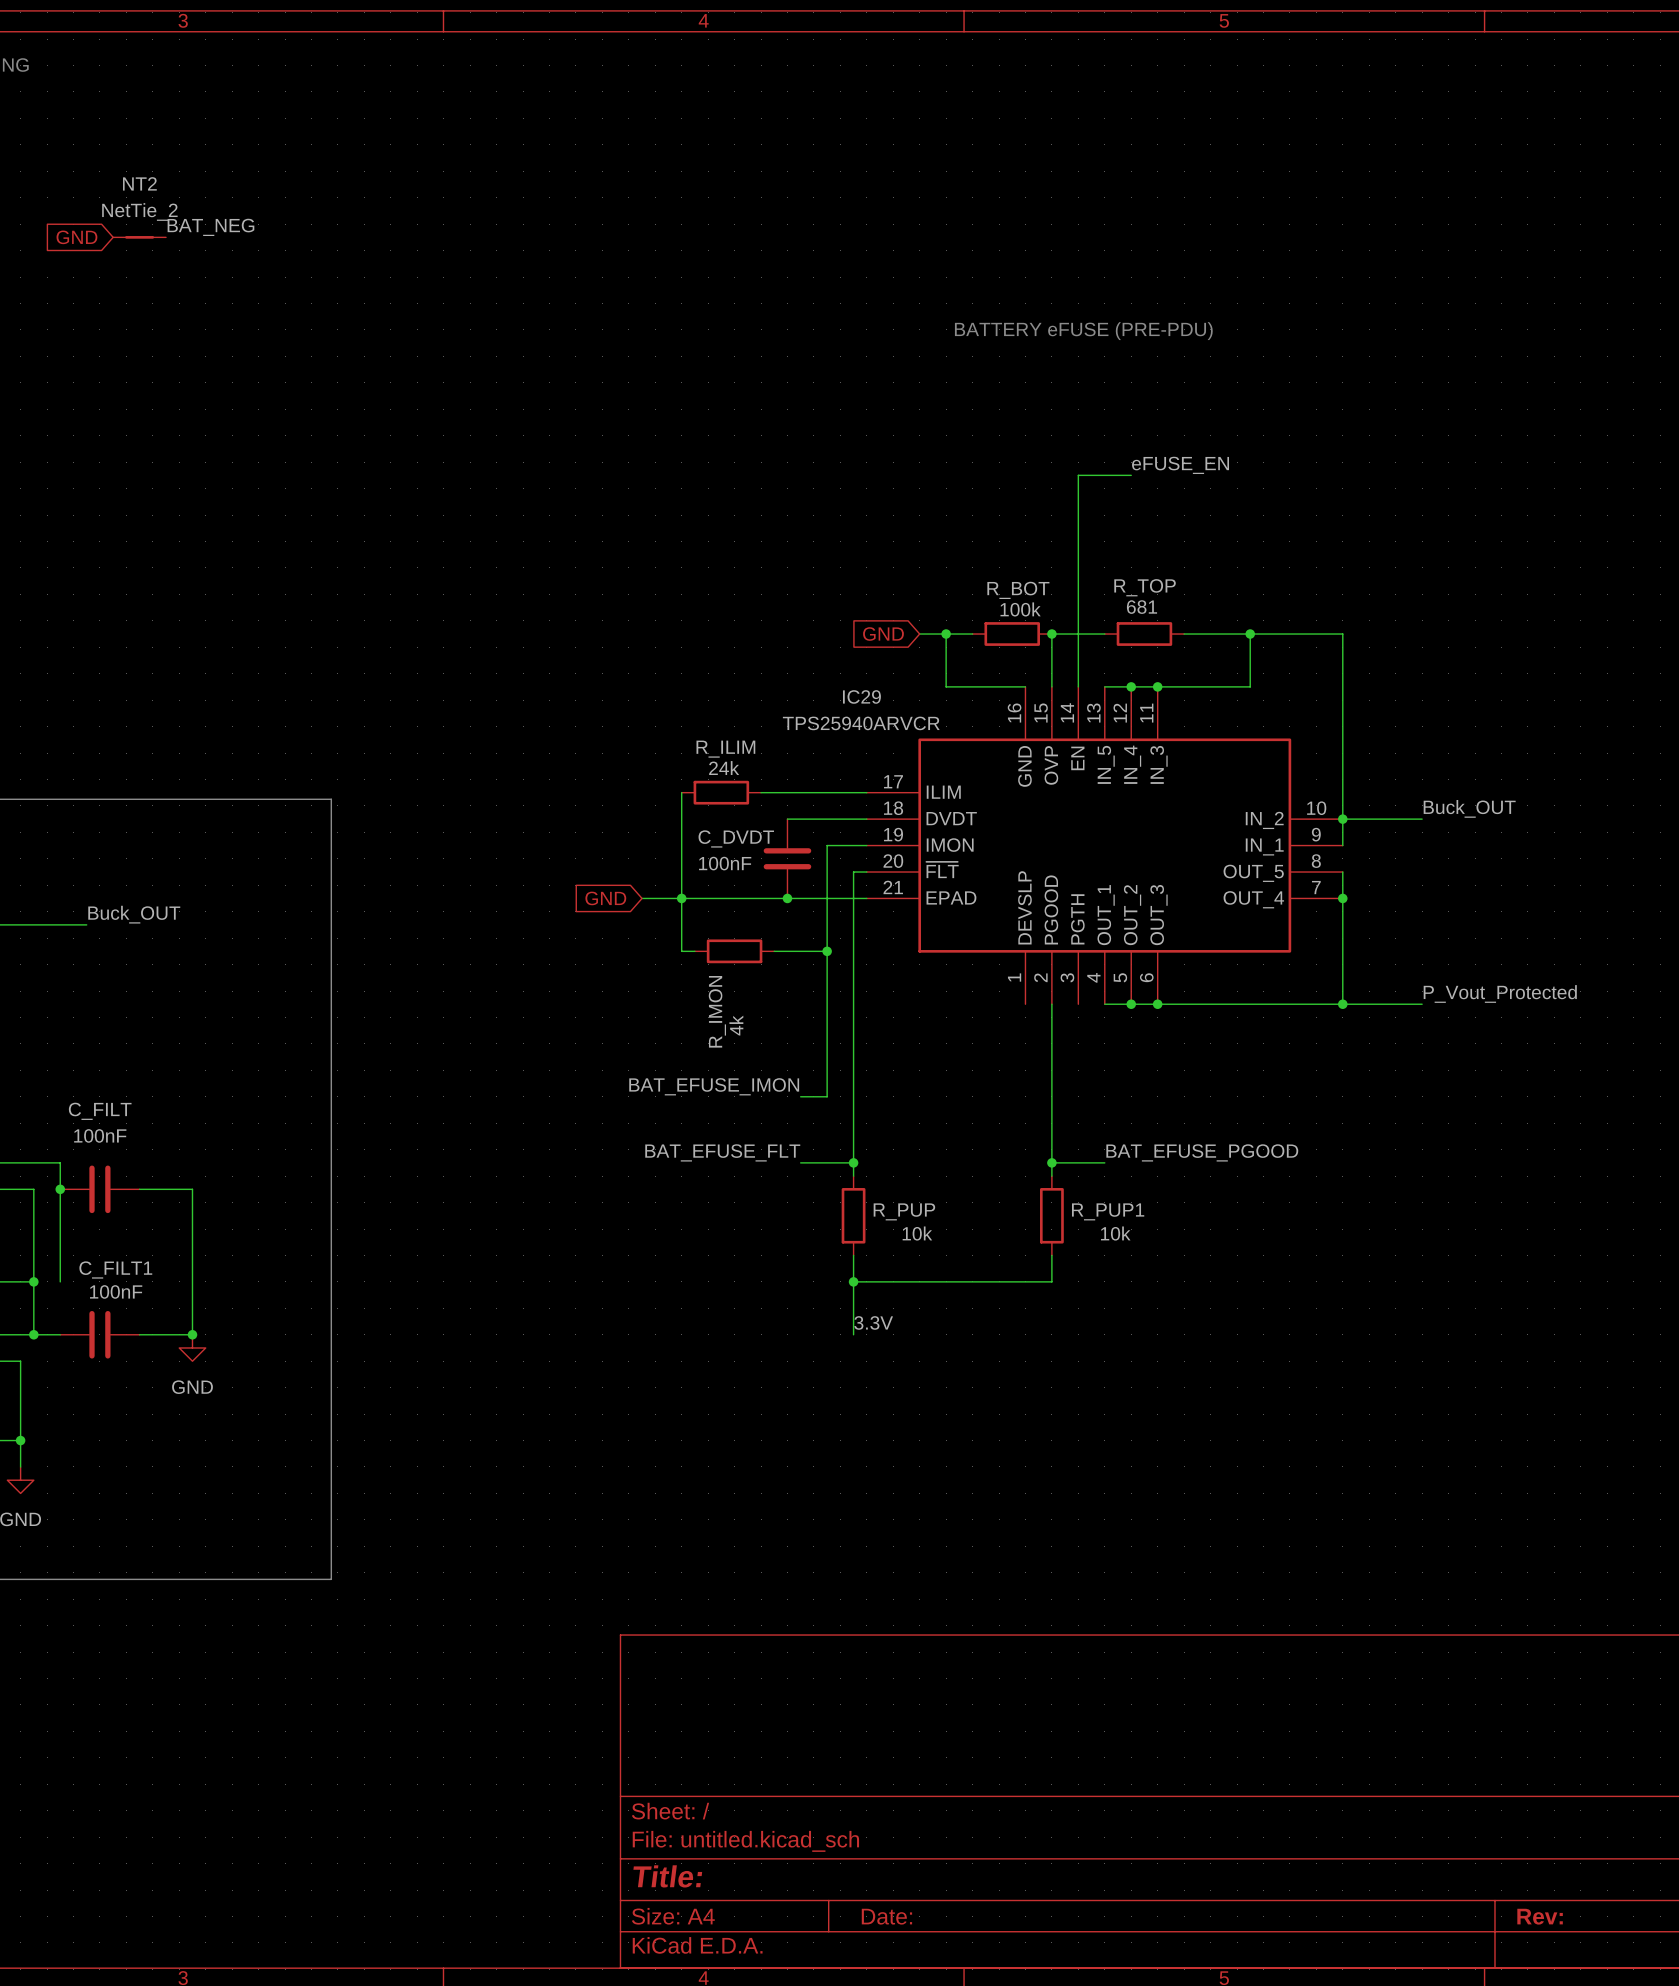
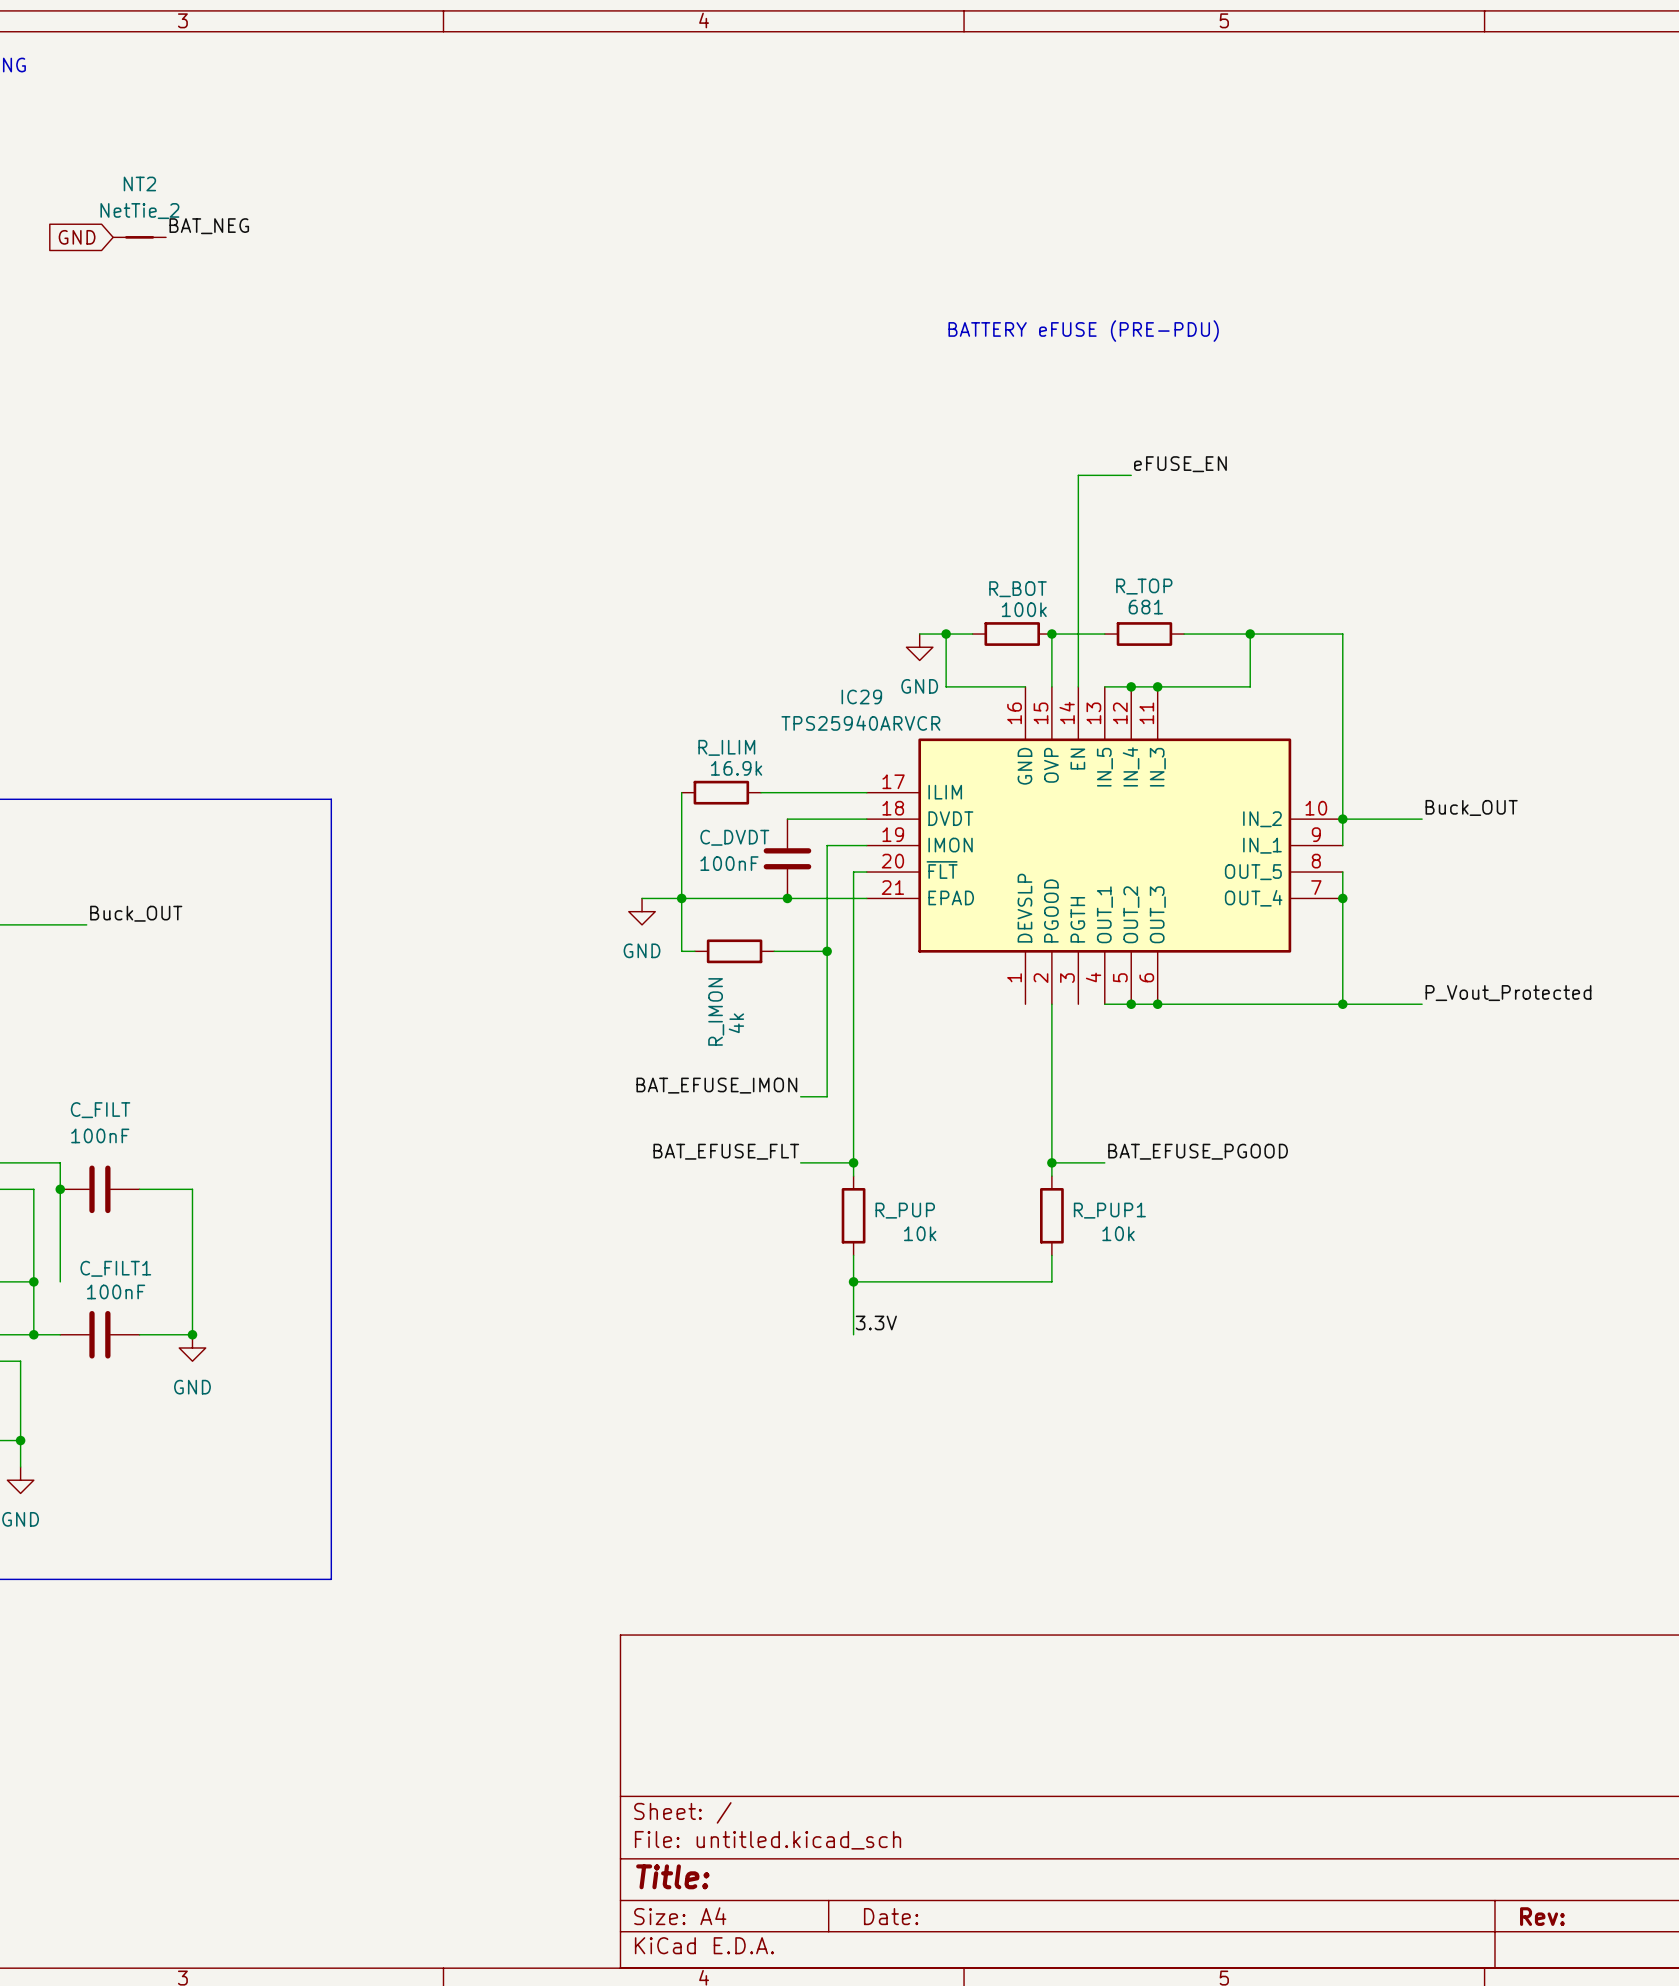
global label: GND (883, 634) -> none
power symbol: none -> GND (919, 647)
R_ILIM value: 24k (724, 768) -> 16.9k (736, 768)
global label: GND (605, 898) -> none
power symbol: none -> GND (642, 911)

